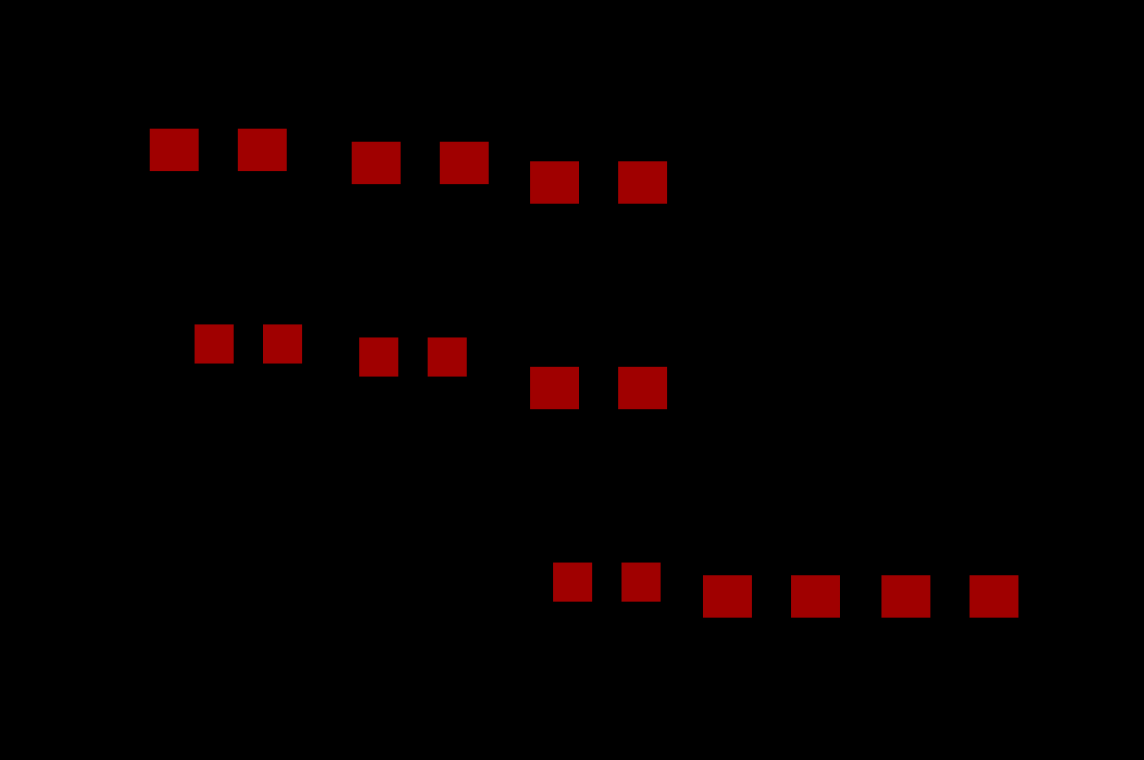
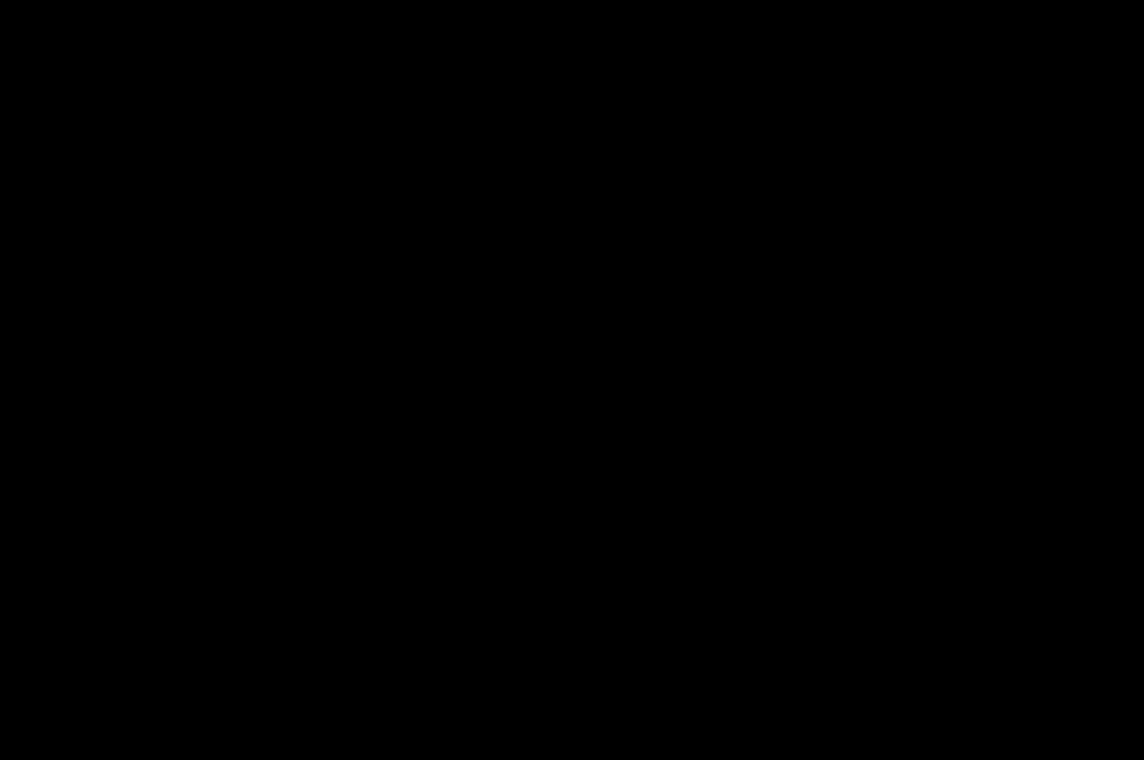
part: (218, 149) -> none
part: (420, 162) -> none
part: (598, 182) -> none
part: (248, 343) -> none
part: (412, 357) -> none
part: (598, 388) -> none
part: (606, 582) -> none
part: (771, 596) -> none
part: (949, 596) -> none

